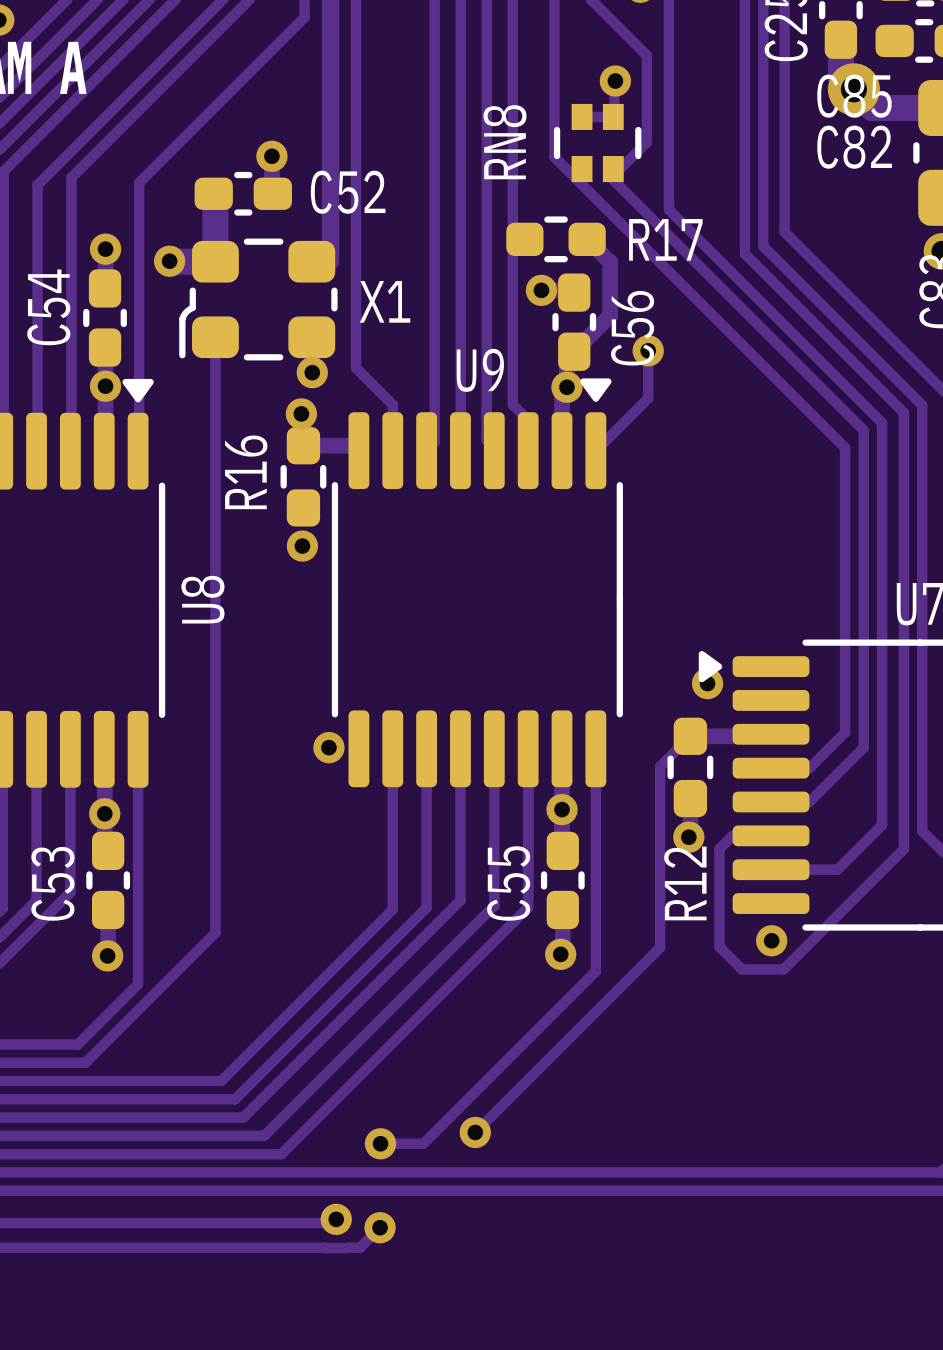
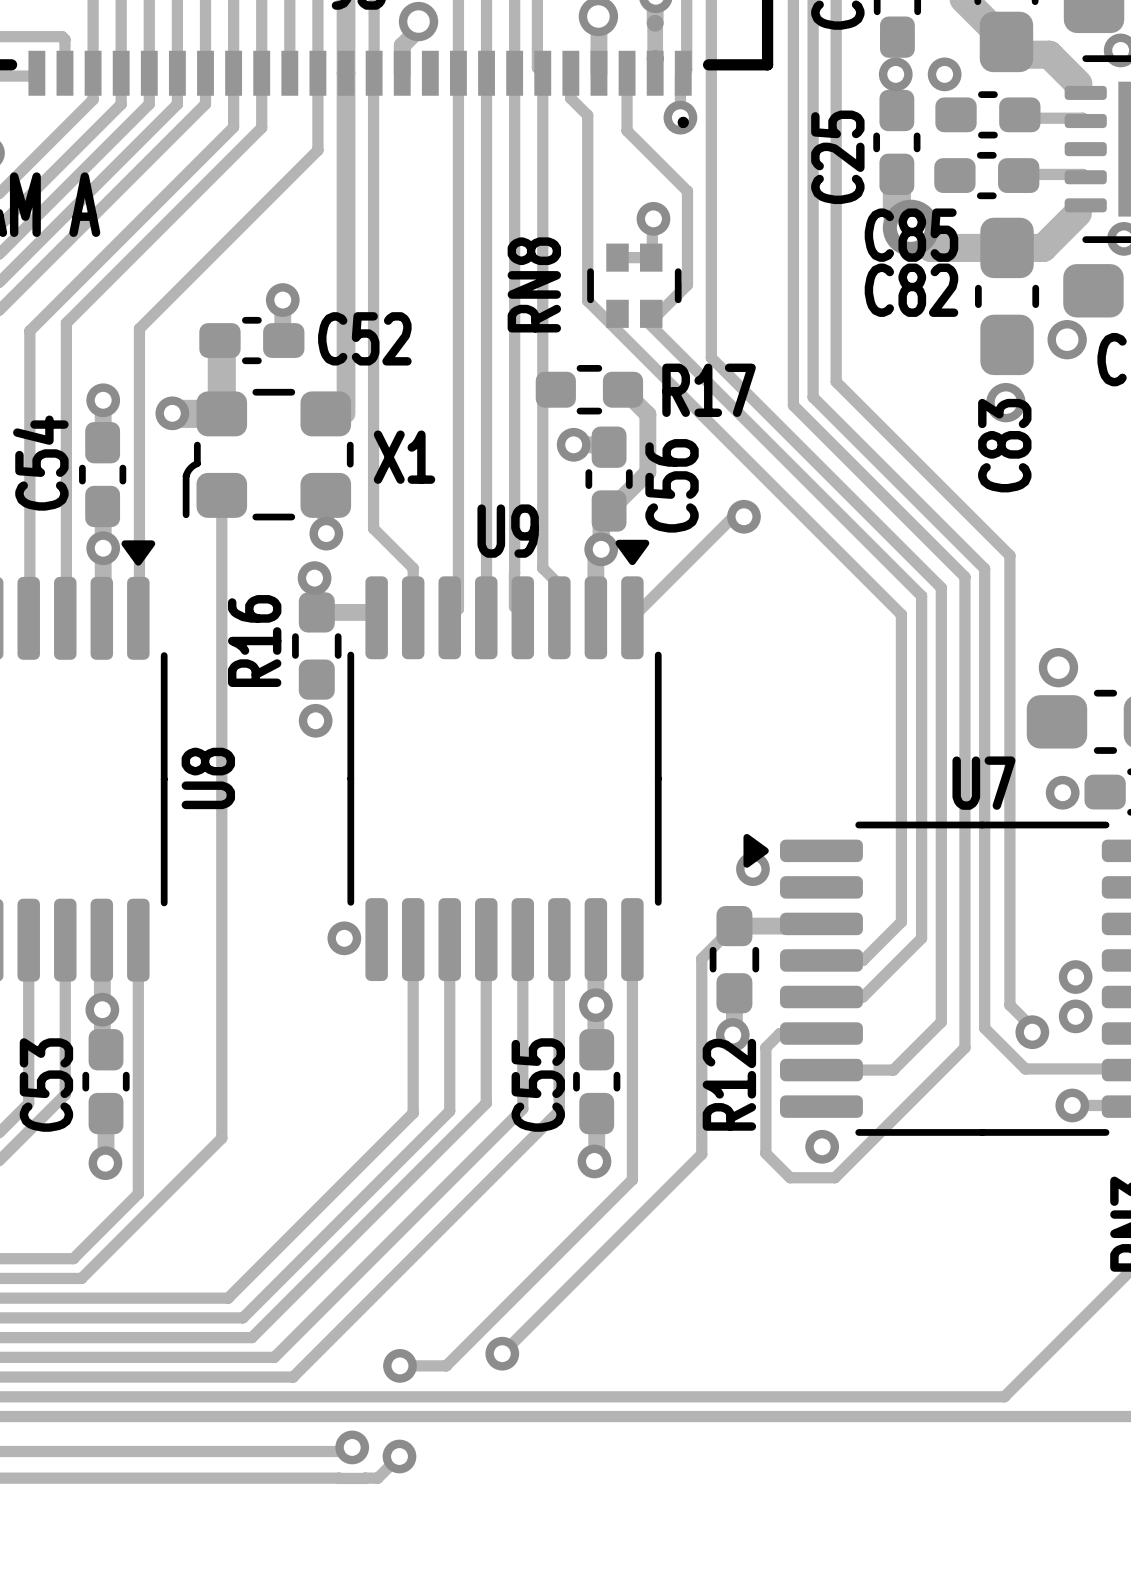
track: (648, 350) (648, 398) -> (743, 516) (733, 516) (688, 561)
via position: (648, 350) -> (743, 516)

